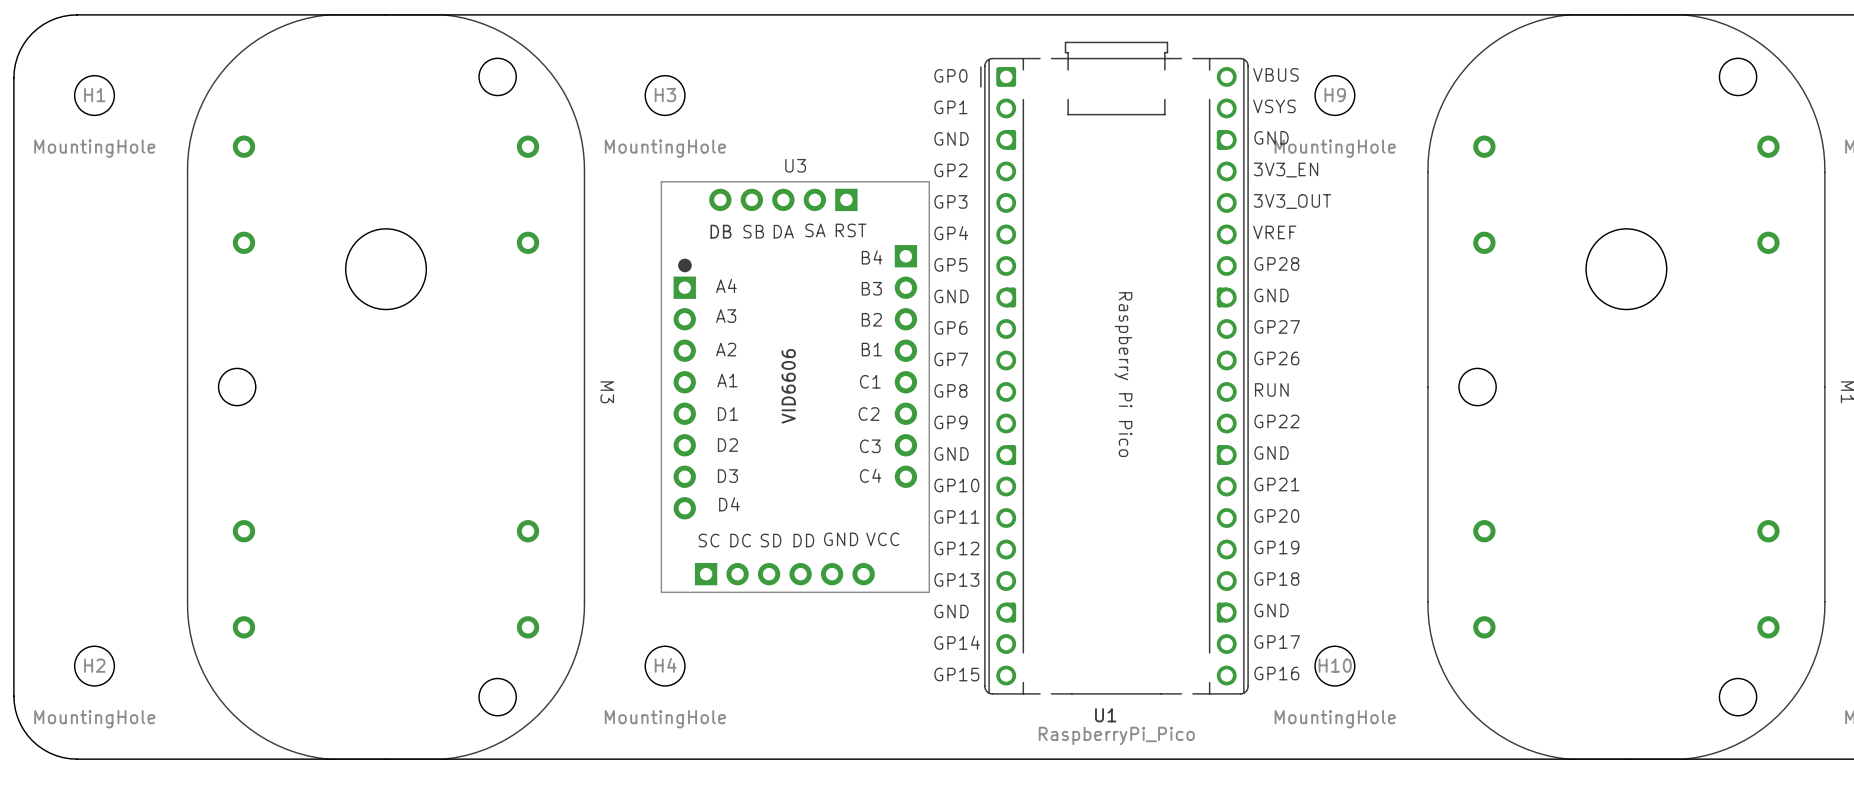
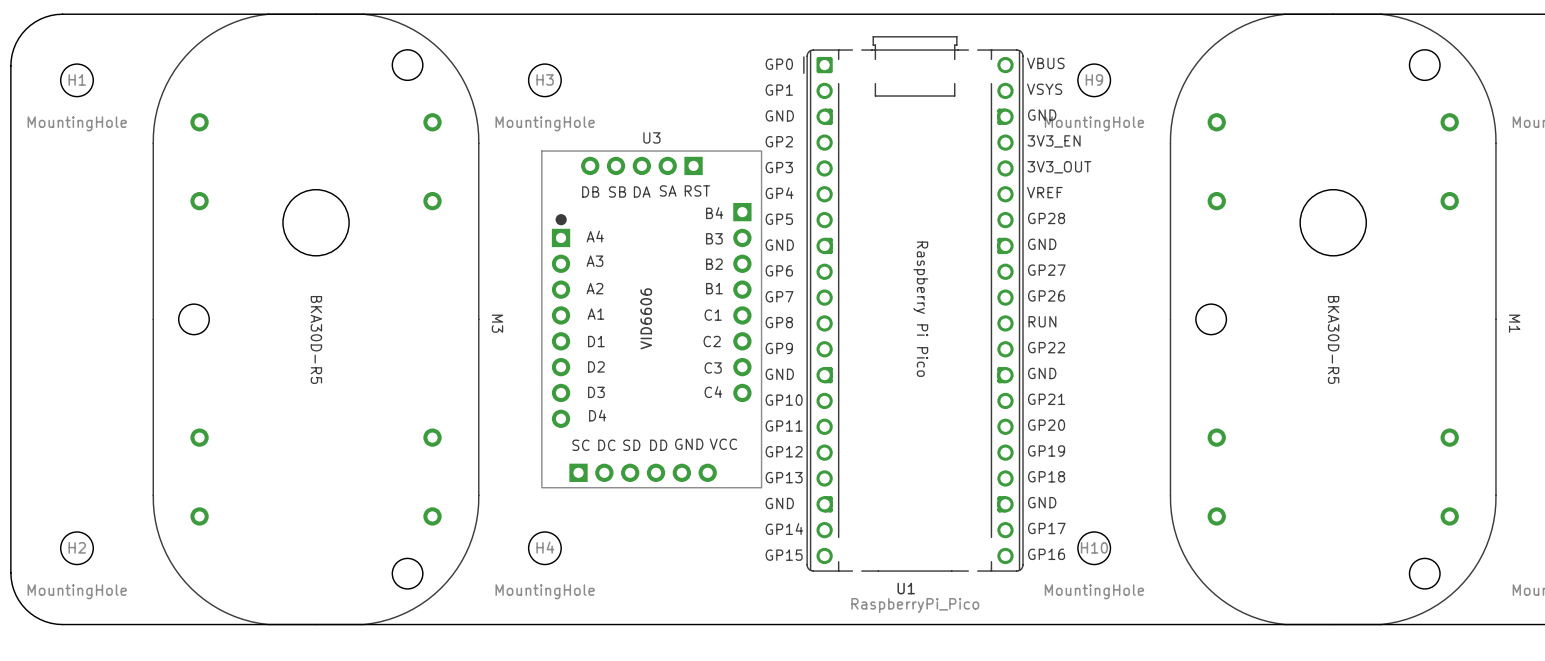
M3 value: none -> BKA30D-R5 (316, 339)
M1 value: none -> BKA30D-R5 (1333, 339)

